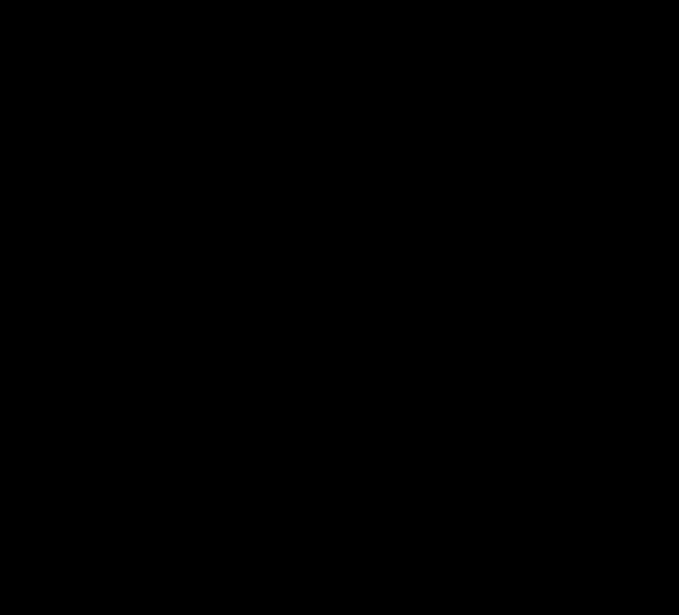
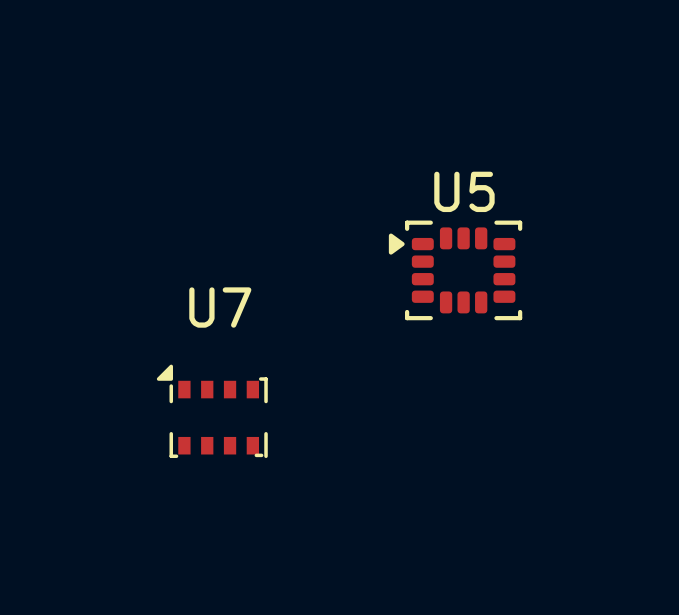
U5: none -> (455, 270)
U7: none -> (212, 411)

